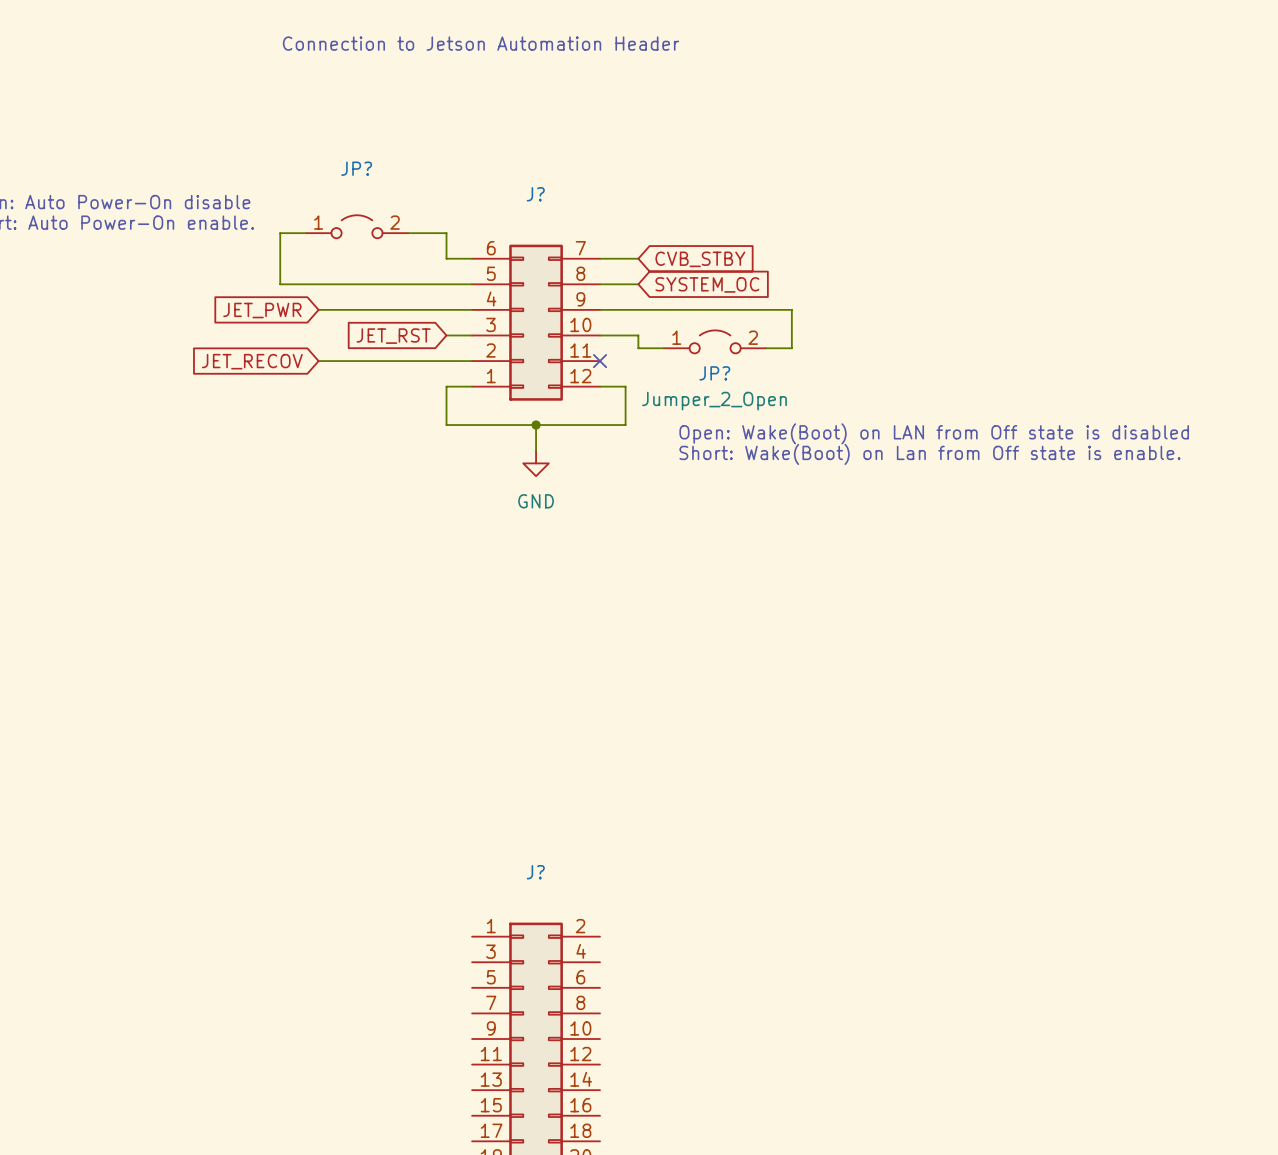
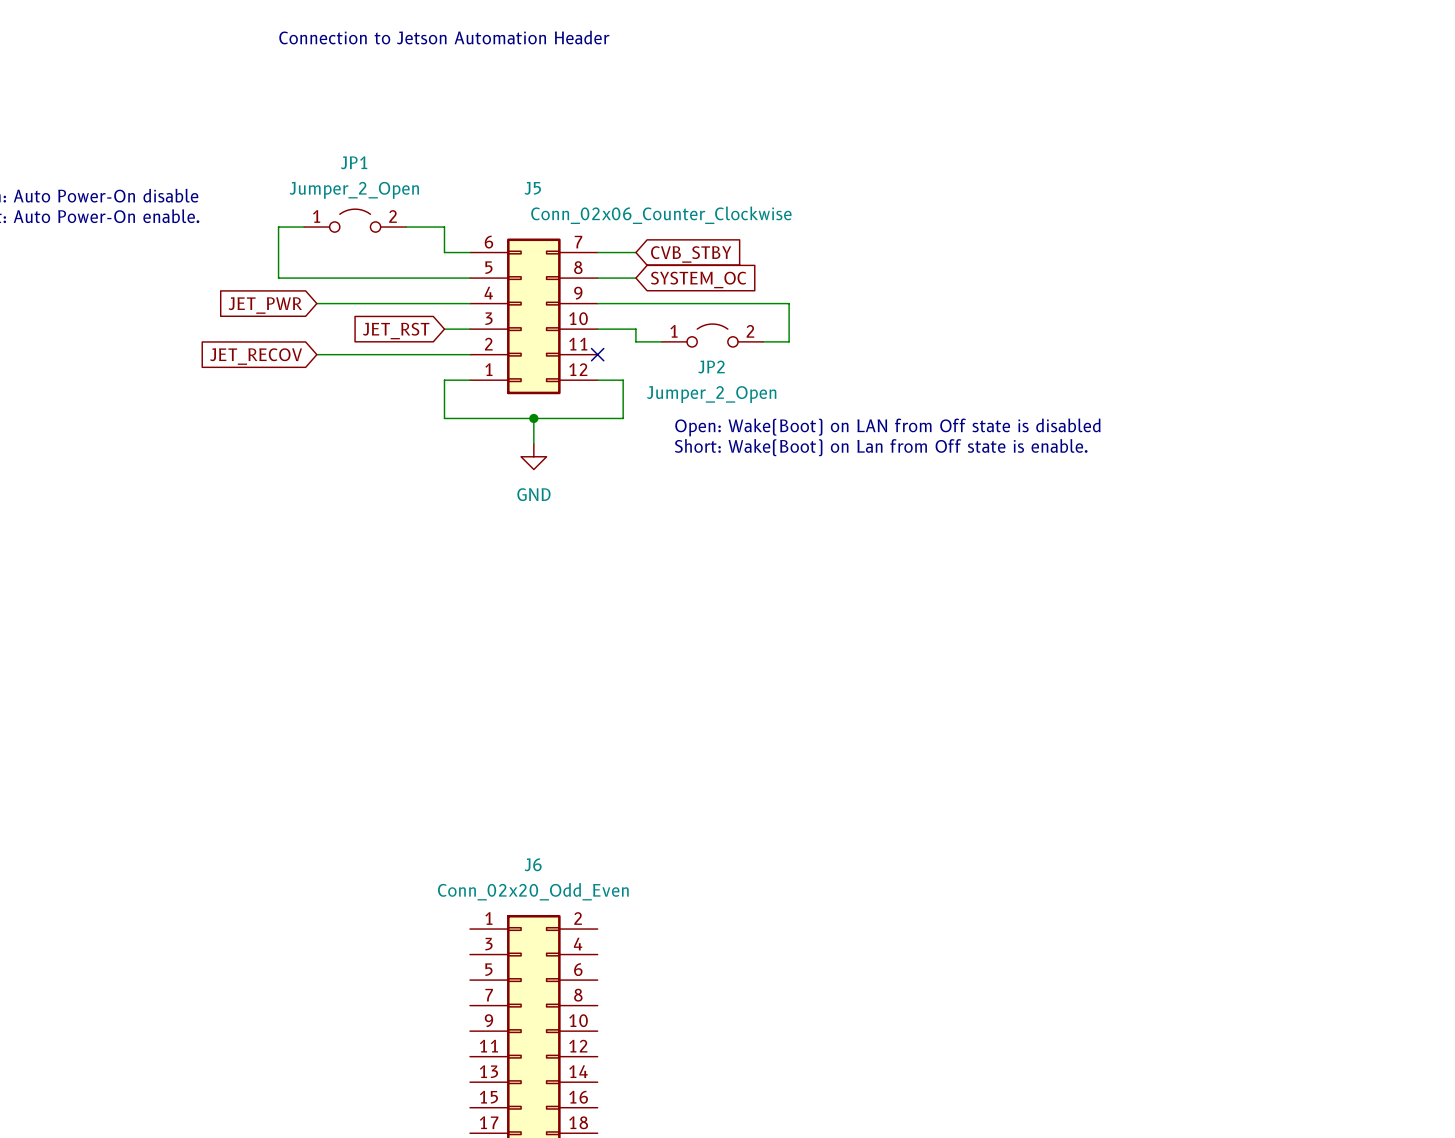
JP? name: JP? (356, 168) -> JP1 (354, 162)
J? name: J? (535, 194) -> J5 (532, 188)
JP? value: none -> Jumper_2_Open (354, 190)
J? value: none -> Conn_02x06_Counter_Clockwise (661, 215)
JP? name: JP? (714, 373) -> JP2 (711, 367)
J? name: J? (535, 872) -> J6 (533, 864)
J? value: none -> Conn_02x20_Odd_Even (533, 891)

